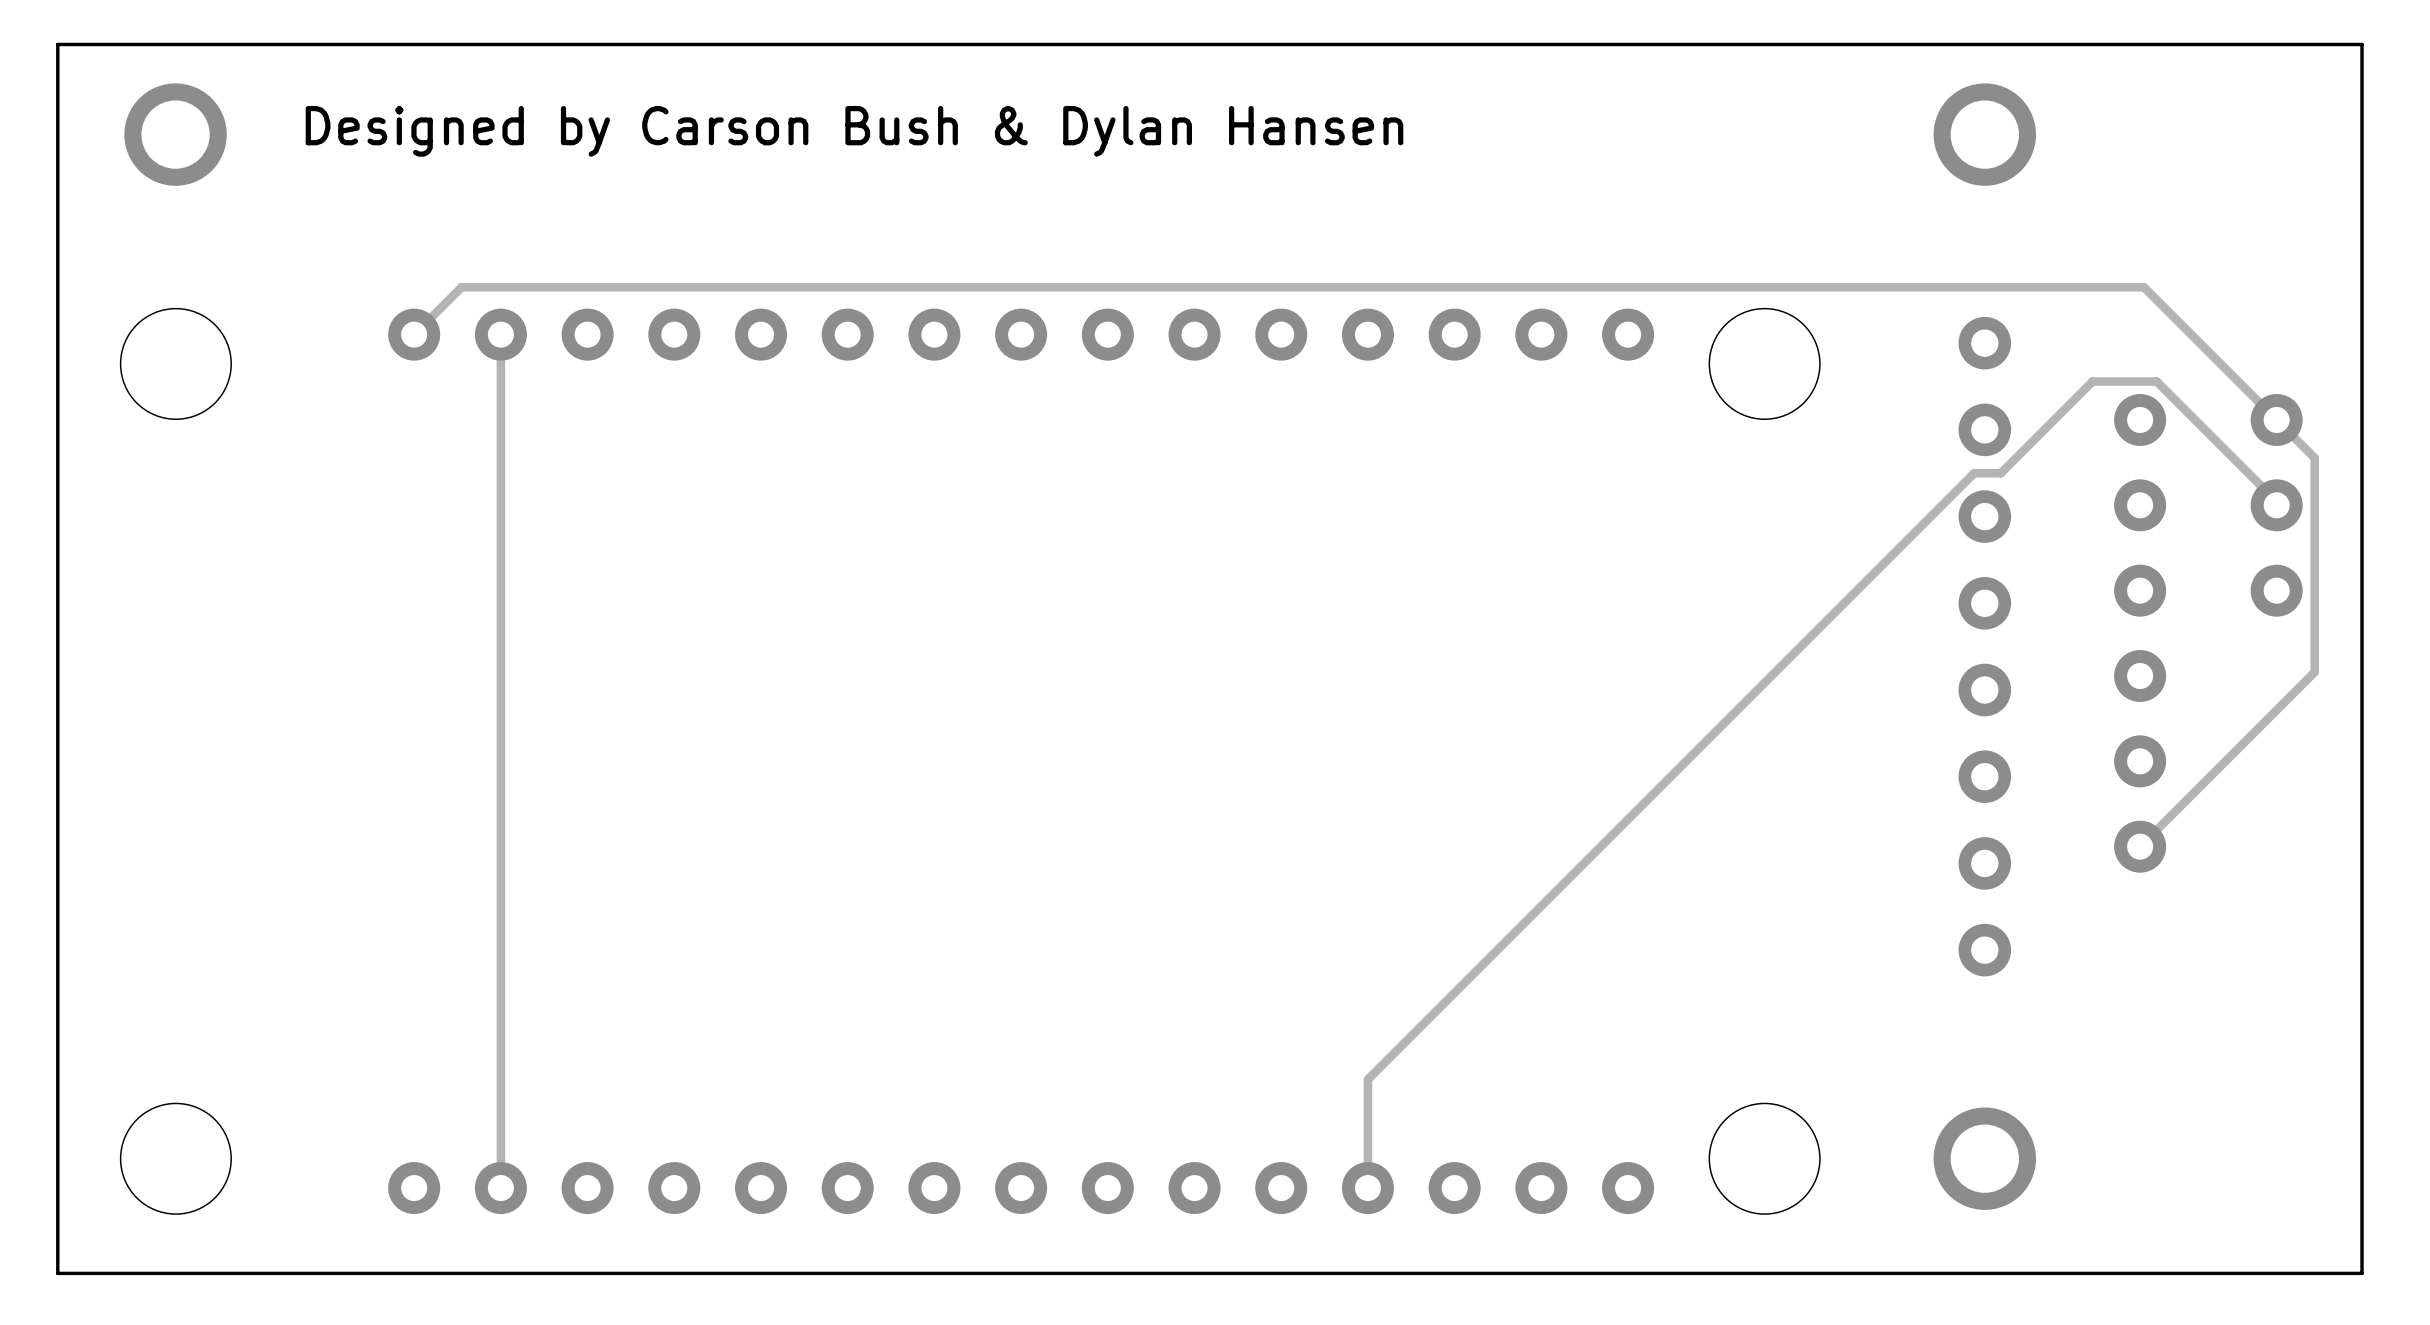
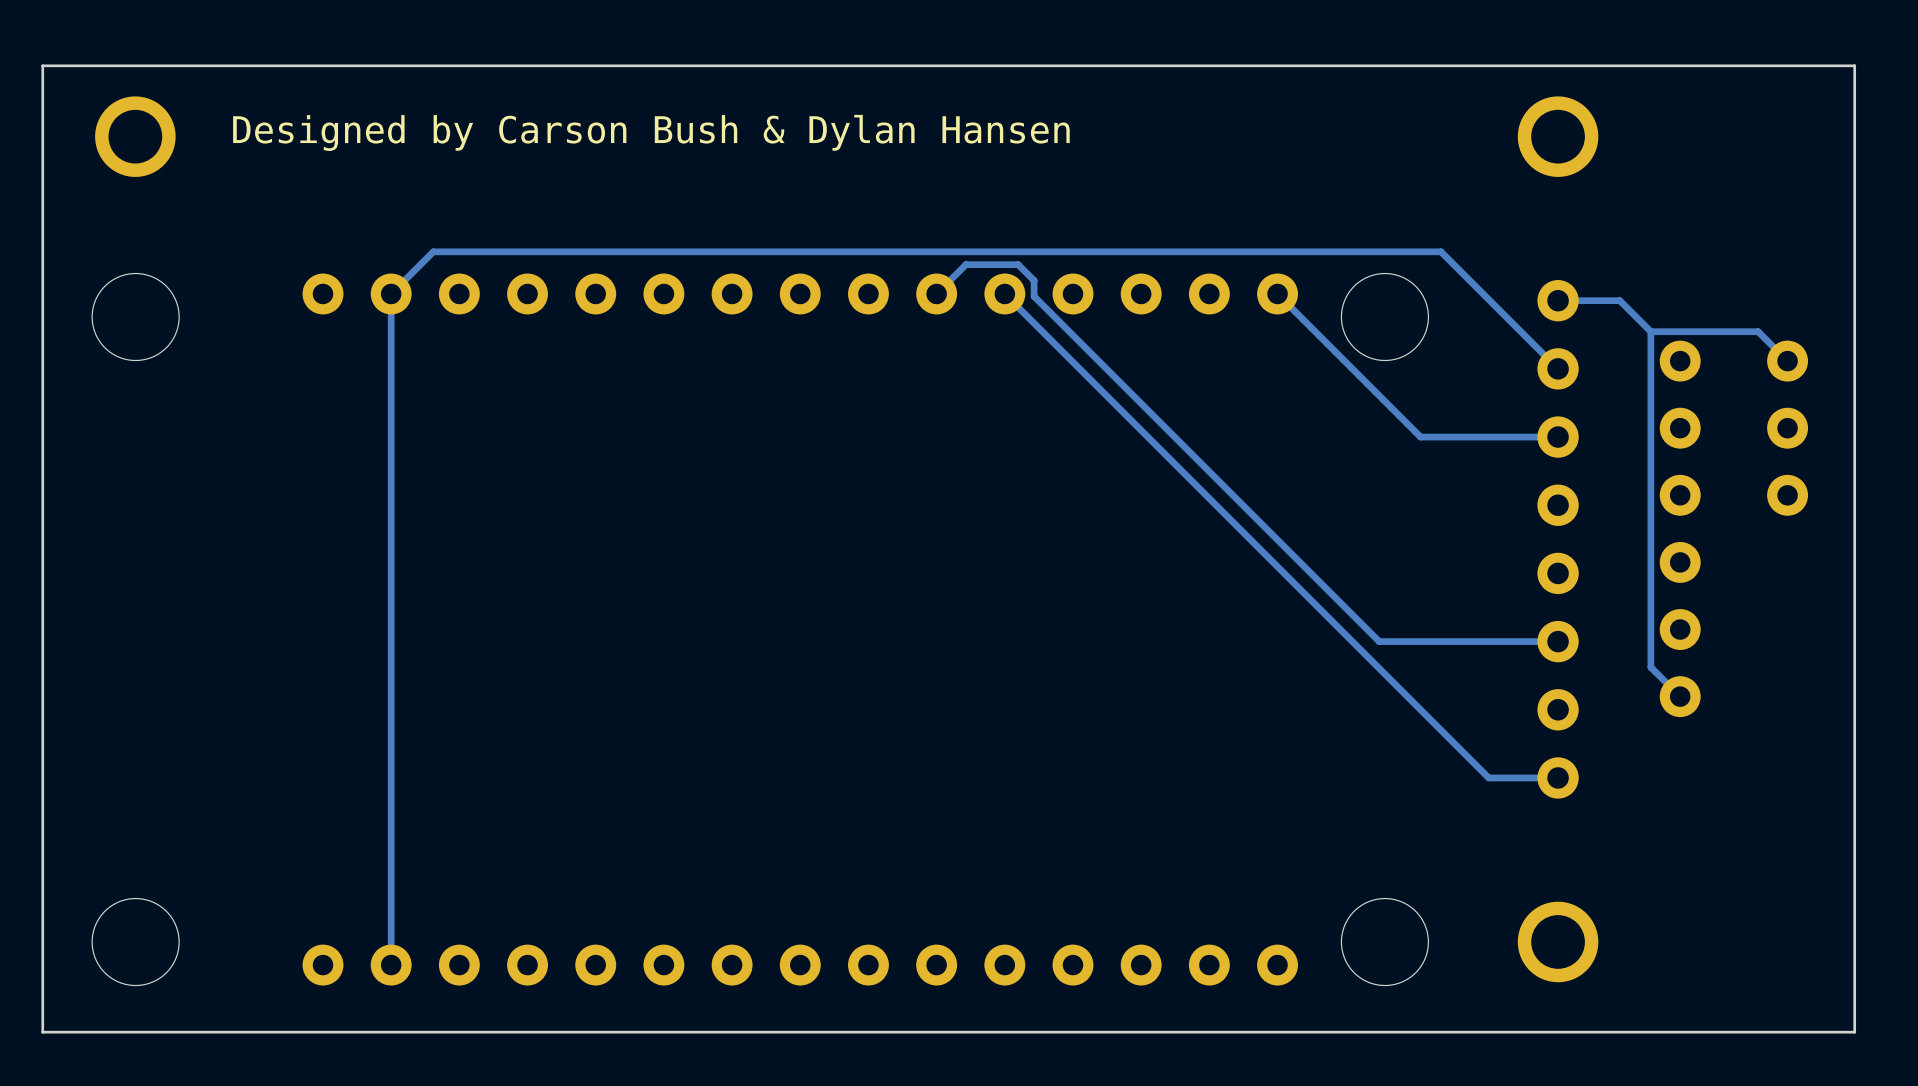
track: (414, 334) (461, 287) (2143, 287) (2239, 382) -> (1650, 331) (1758, 331)
track: none -> (391, 293) (433, 251) (1441, 251) (1558, 368)
track: none -> (936, 293) (965, 264) (1018, 264) (1034, 280) (1034, 296) (1379, 641) (1558, 641)
track: none -> (1004, 293) (1488, 777) (1558, 777)
track: none -> (1277, 293) (1420, 437) (1558, 437)
track: none -> (1558, 300) (1619, 300) (1650, 331)
track: (2276, 419) (2314, 458) (2314, 672) (2140, 846) -> (1650, 331) (1650, 667) (1680, 696)
track: (2276, 505) (2276, 501) (2156, 381) (2092, 381) (2000, 473) (1974, 473) (1367, 1079) (1367, 1188) -> none

